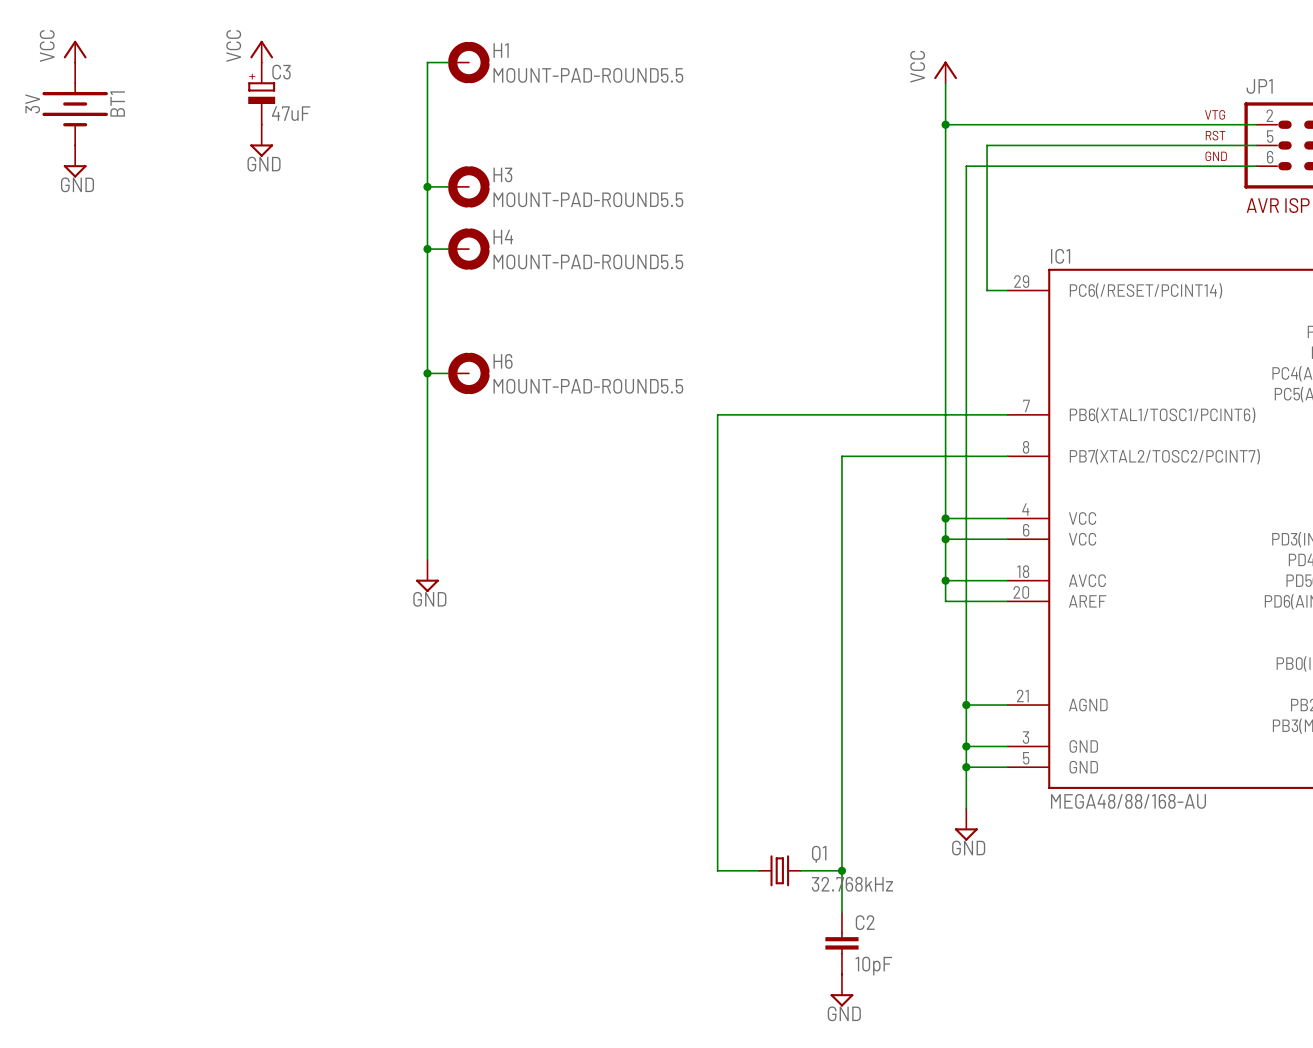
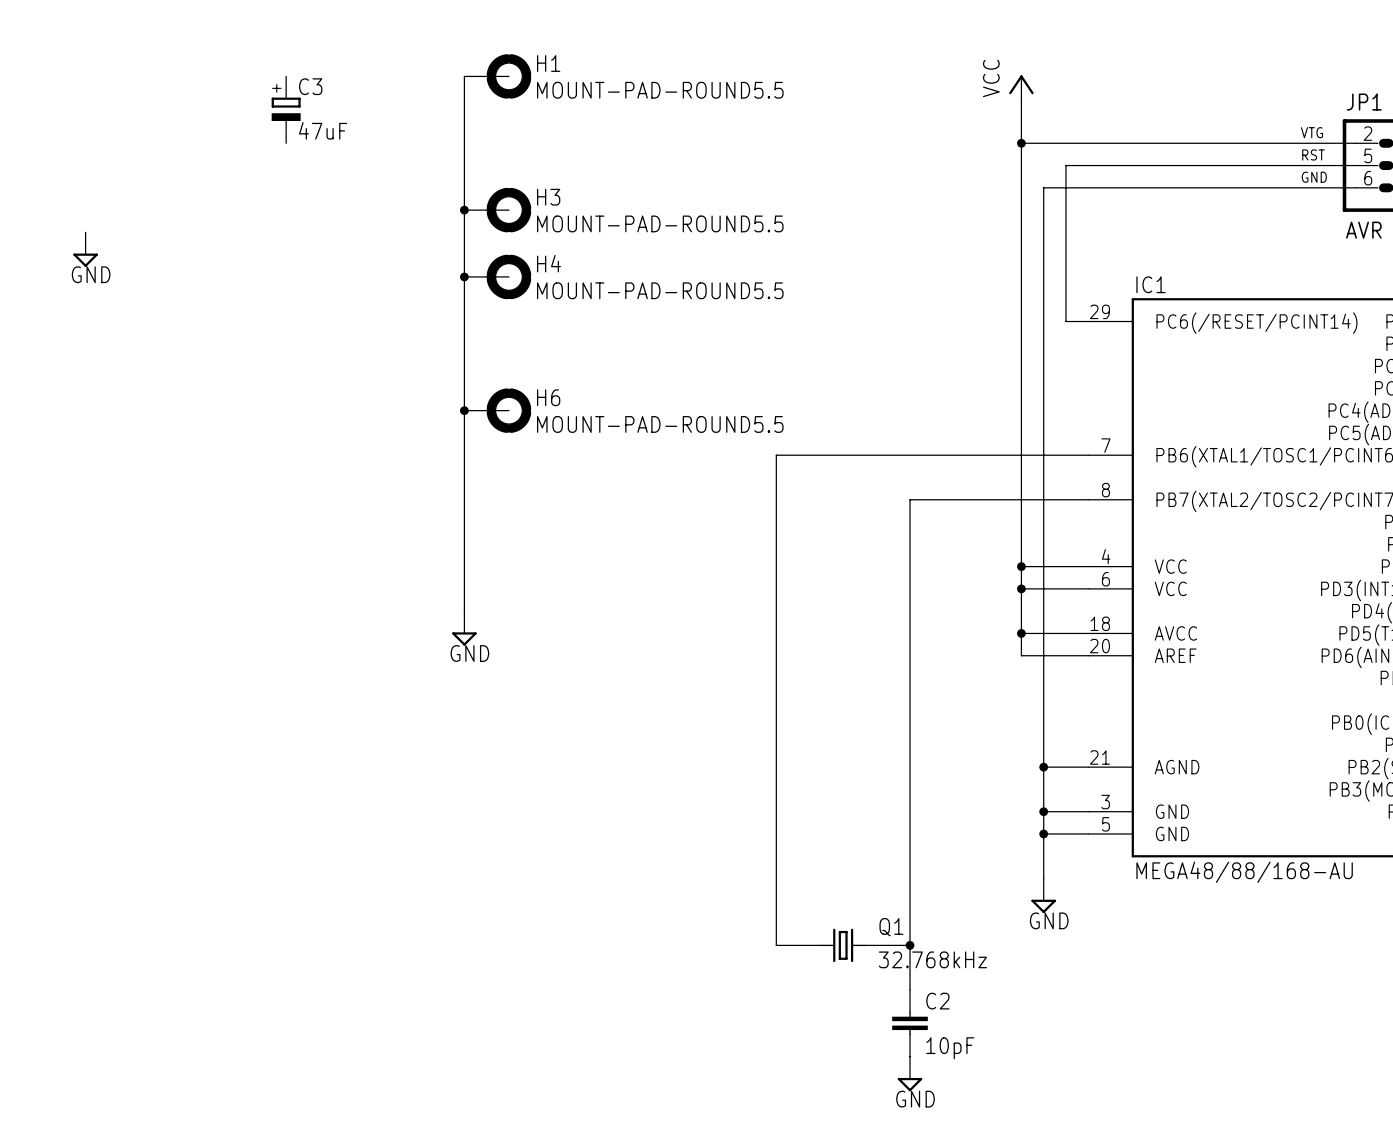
power symbol: VCC (75, 51) -> none
power symbol: VCC (261, 51) -> none
BT1: 3V (75, 104) -> none
power symbol: GND (261, 140) -> none
power symbol position: GND (75, 161) -> GND (85, 249)

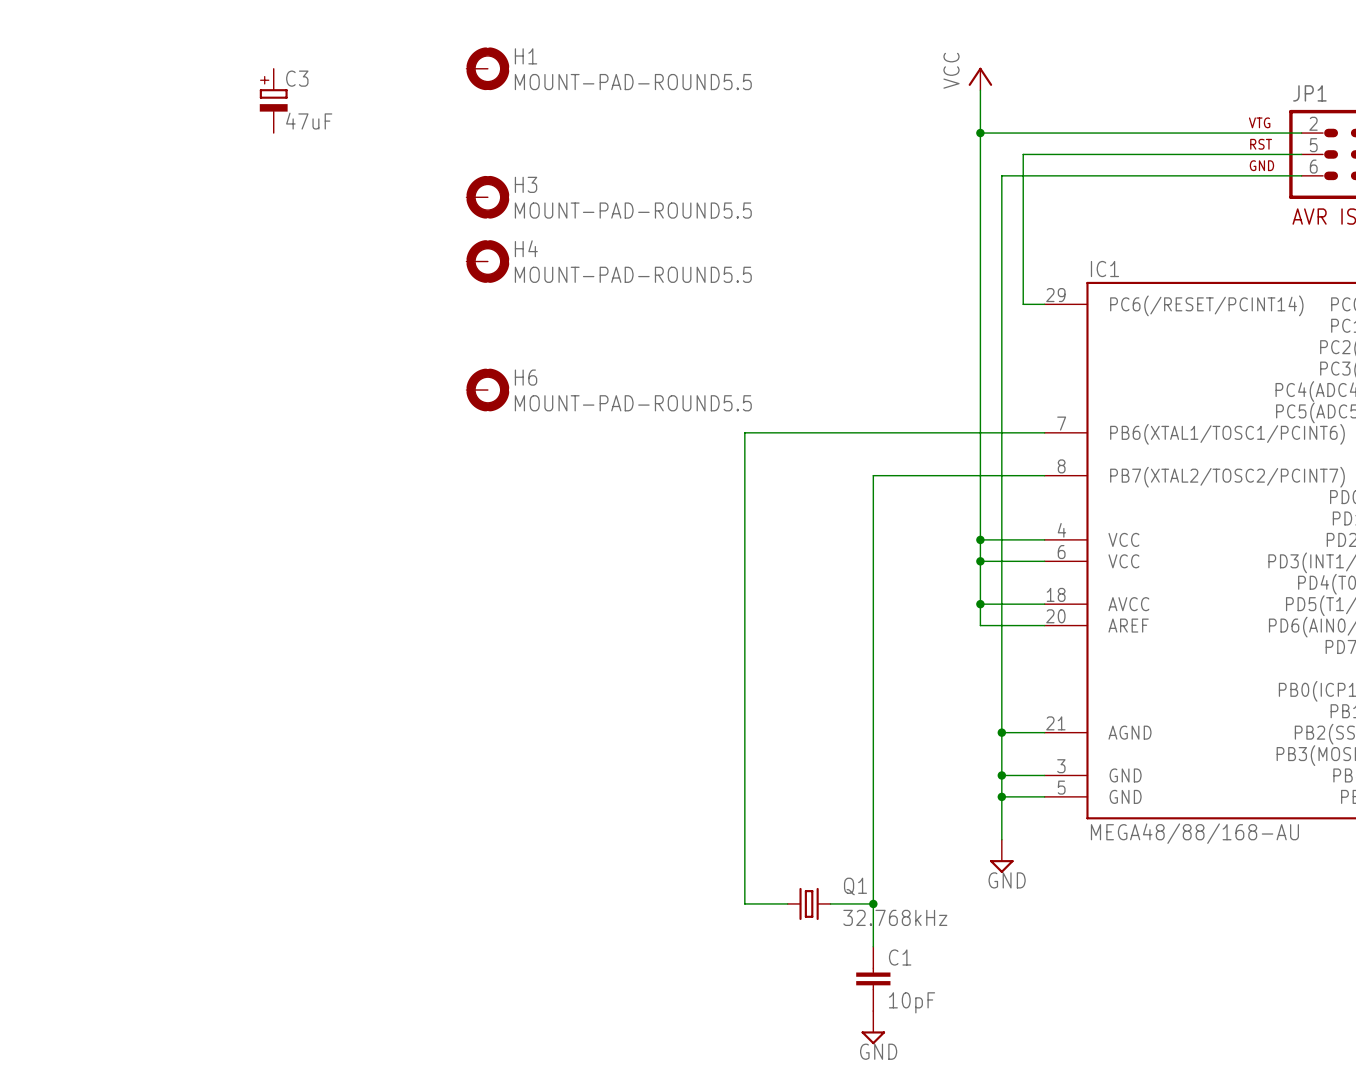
wire: (486, 76) (464, 76) (464, 611) -> none
wire: (464, 210) (486, 210) -> none
junction: (464, 210) -> none
power symbol: GND (85, 249) -> none
wire: (464, 276) (486, 276) -> none
junction: (464, 276) -> none
wire: (464, 410) (486, 410) -> none
junction: (464, 410) -> none
power symbol: GND (464, 628) -> none
C2 name: C2 (937, 1001) -> C1 (900, 957)

